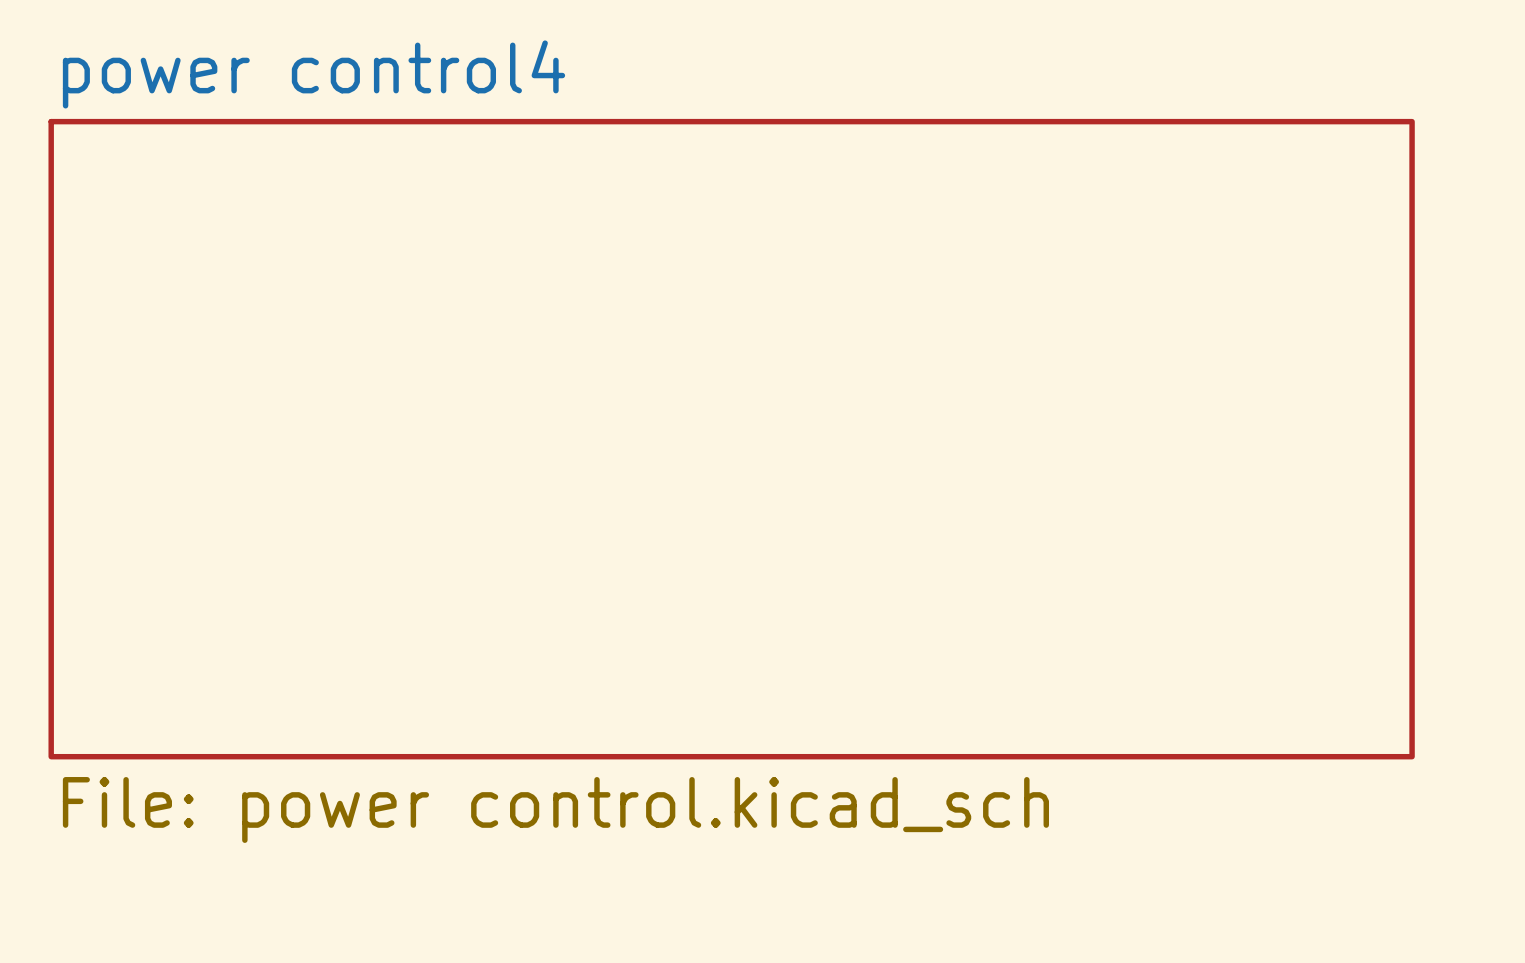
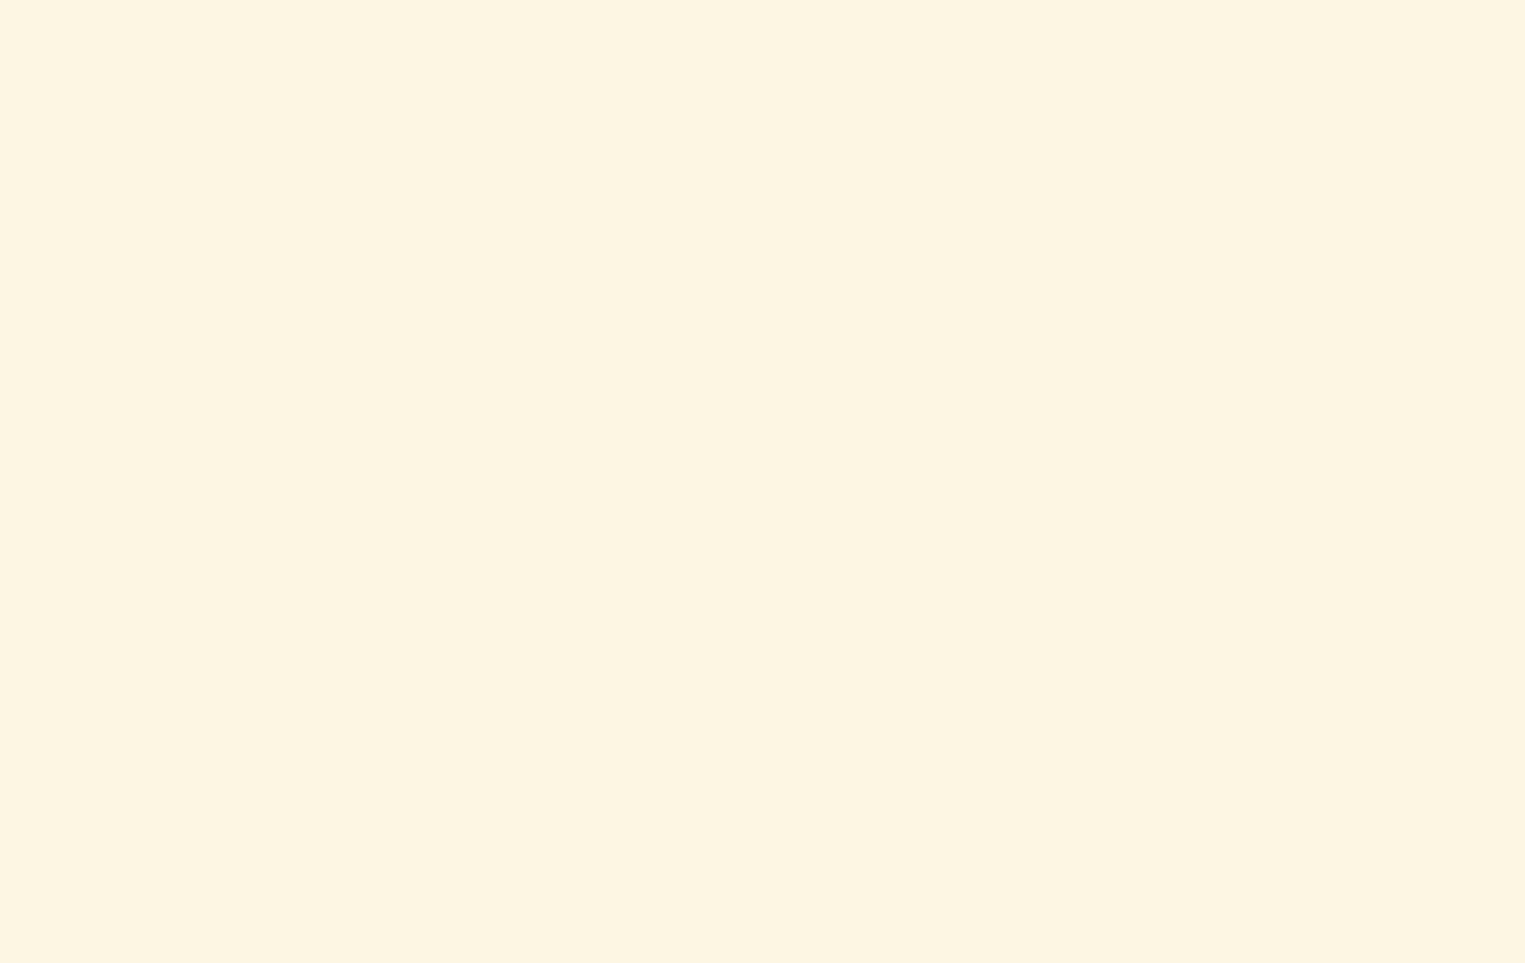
sheet power control4: File: power control.kicad_sch (731, 439) -> none

